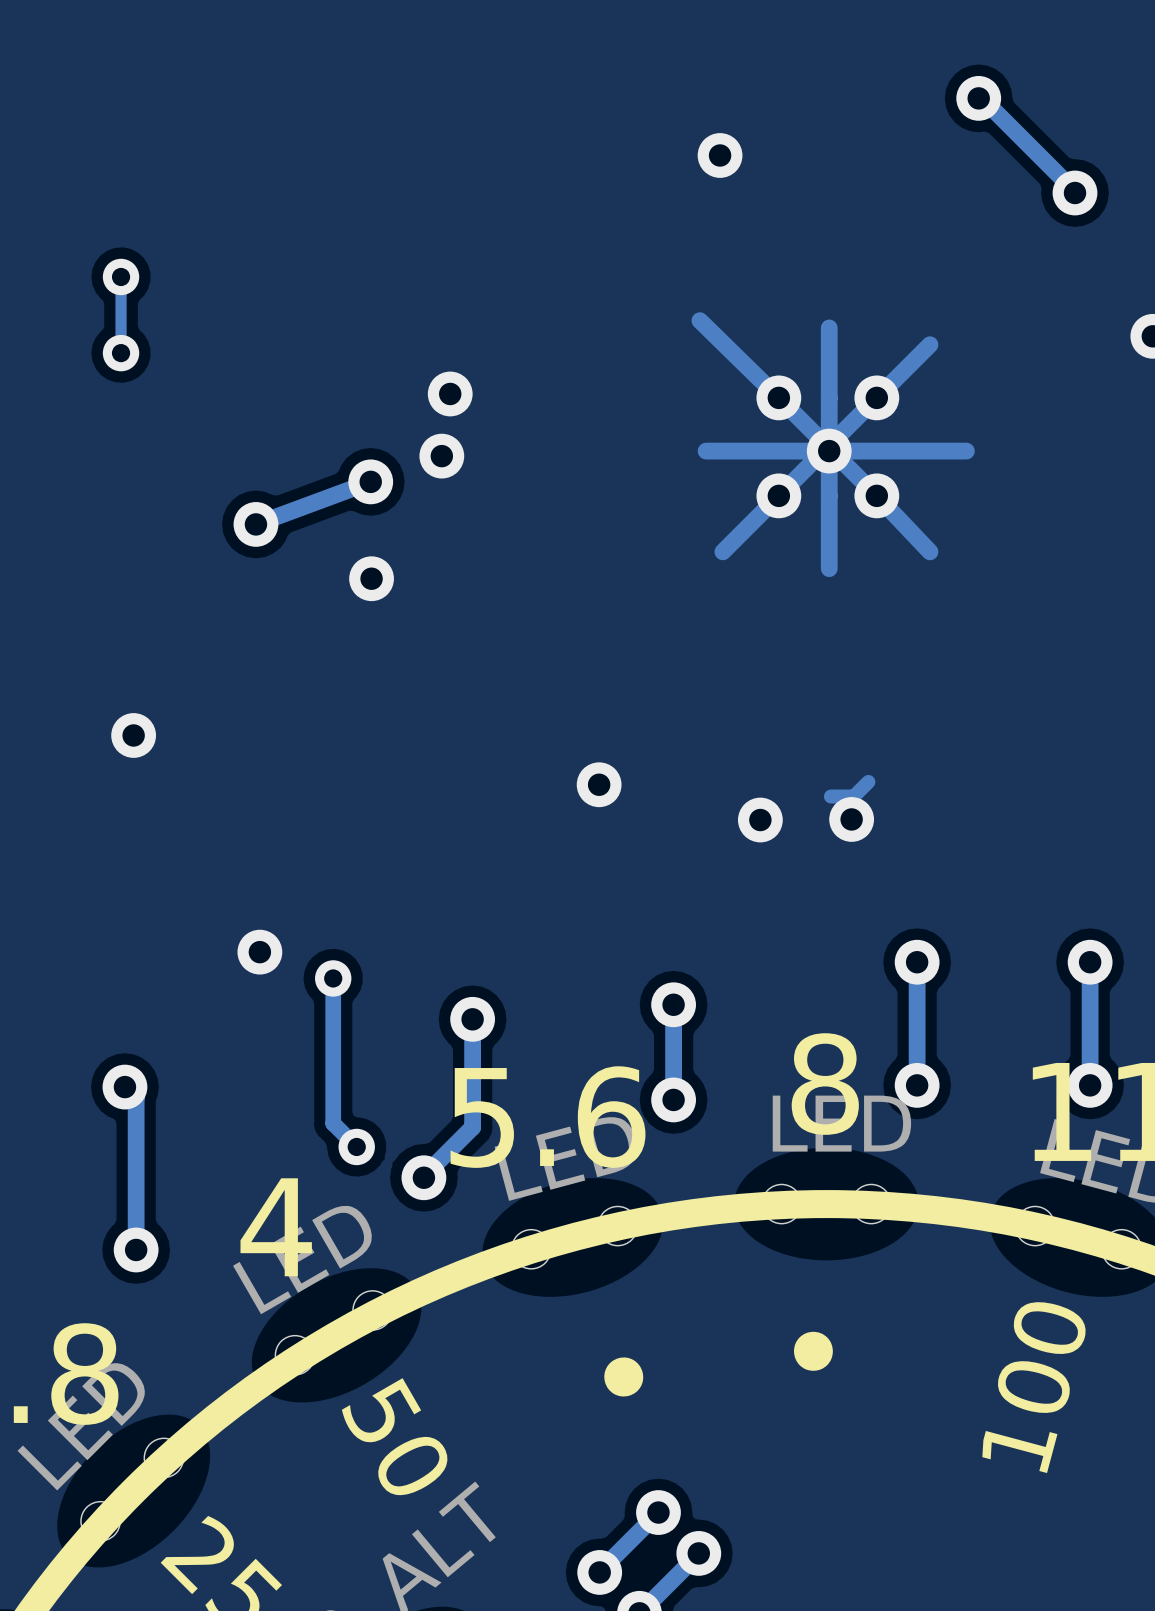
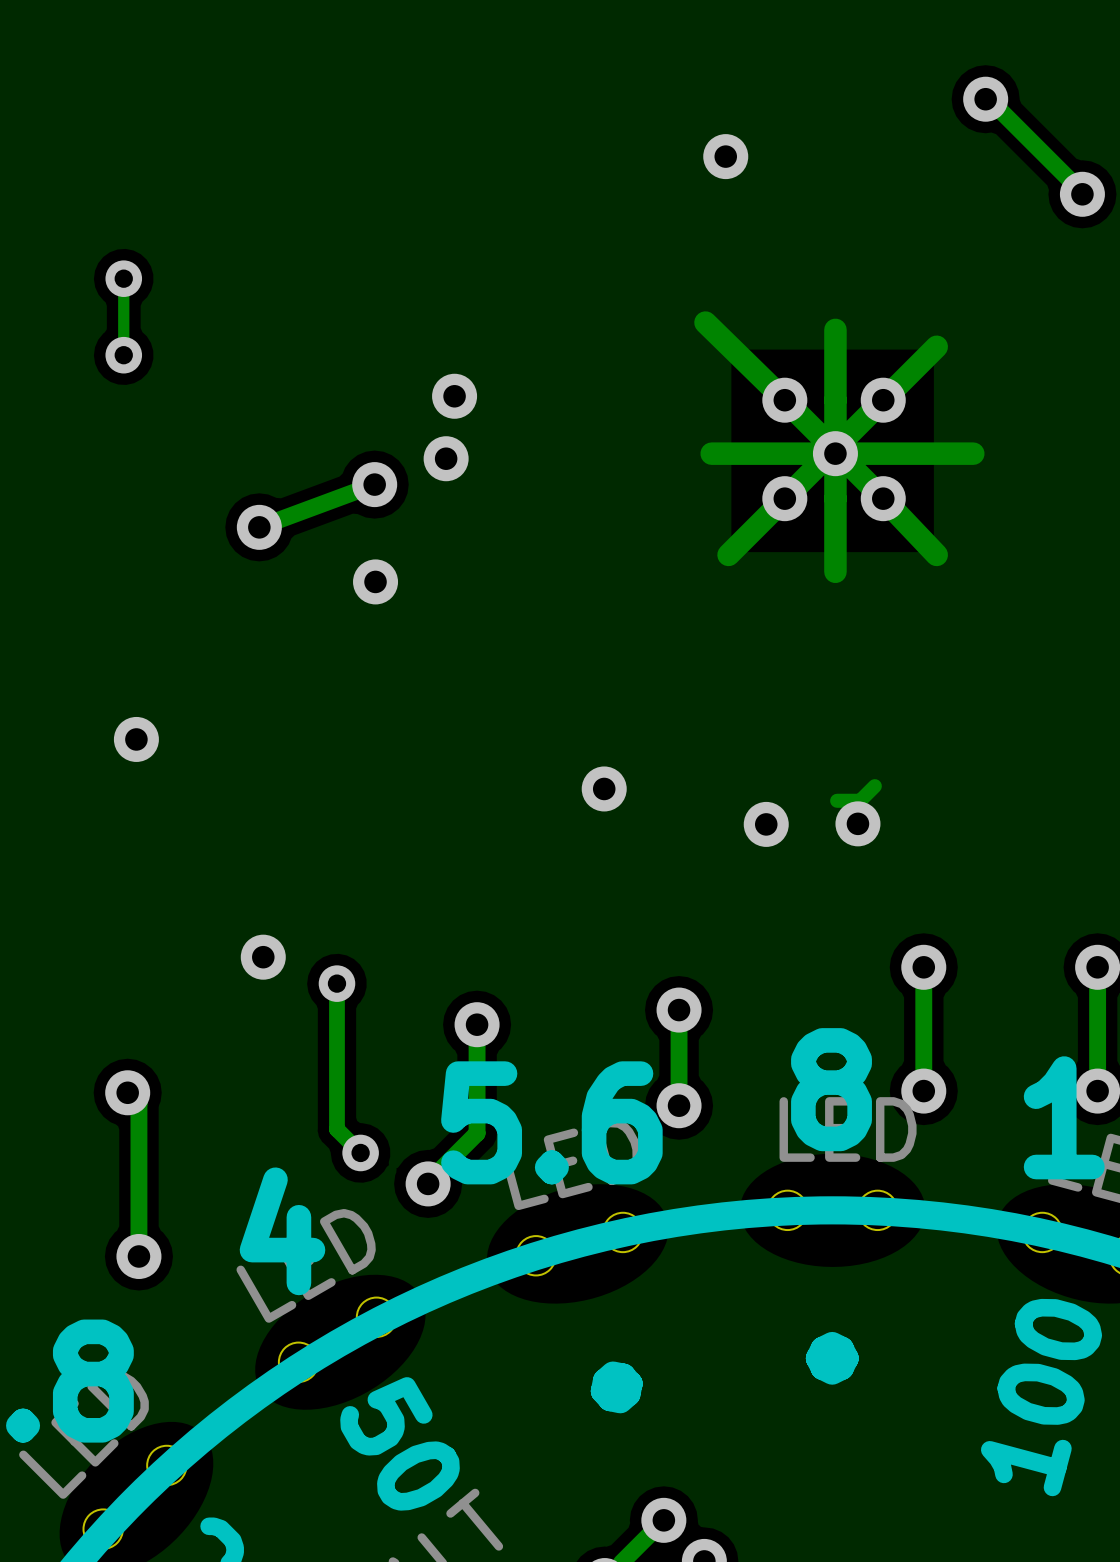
track width: thin (699, 320) (876, 495) (930, 551) -> thick (705, 322) (883, 498) (936, 554)
track width: thin (829, 327) (829, 445) -> thick (835, 329) (835, 448)
track width: thin (930, 344) (827, 446) -> thick (936, 346) (834, 449)
track width: thin (706, 451) (823, 451) (722, 551) -> thick (711, 453) (829, 453) (728, 554)
track width: thin (829, 451) (829, 568) -> thick (835, 453) (835, 571)
track width: thin (966, 451) (834, 451) -> thick (973, 453) (841, 453)

